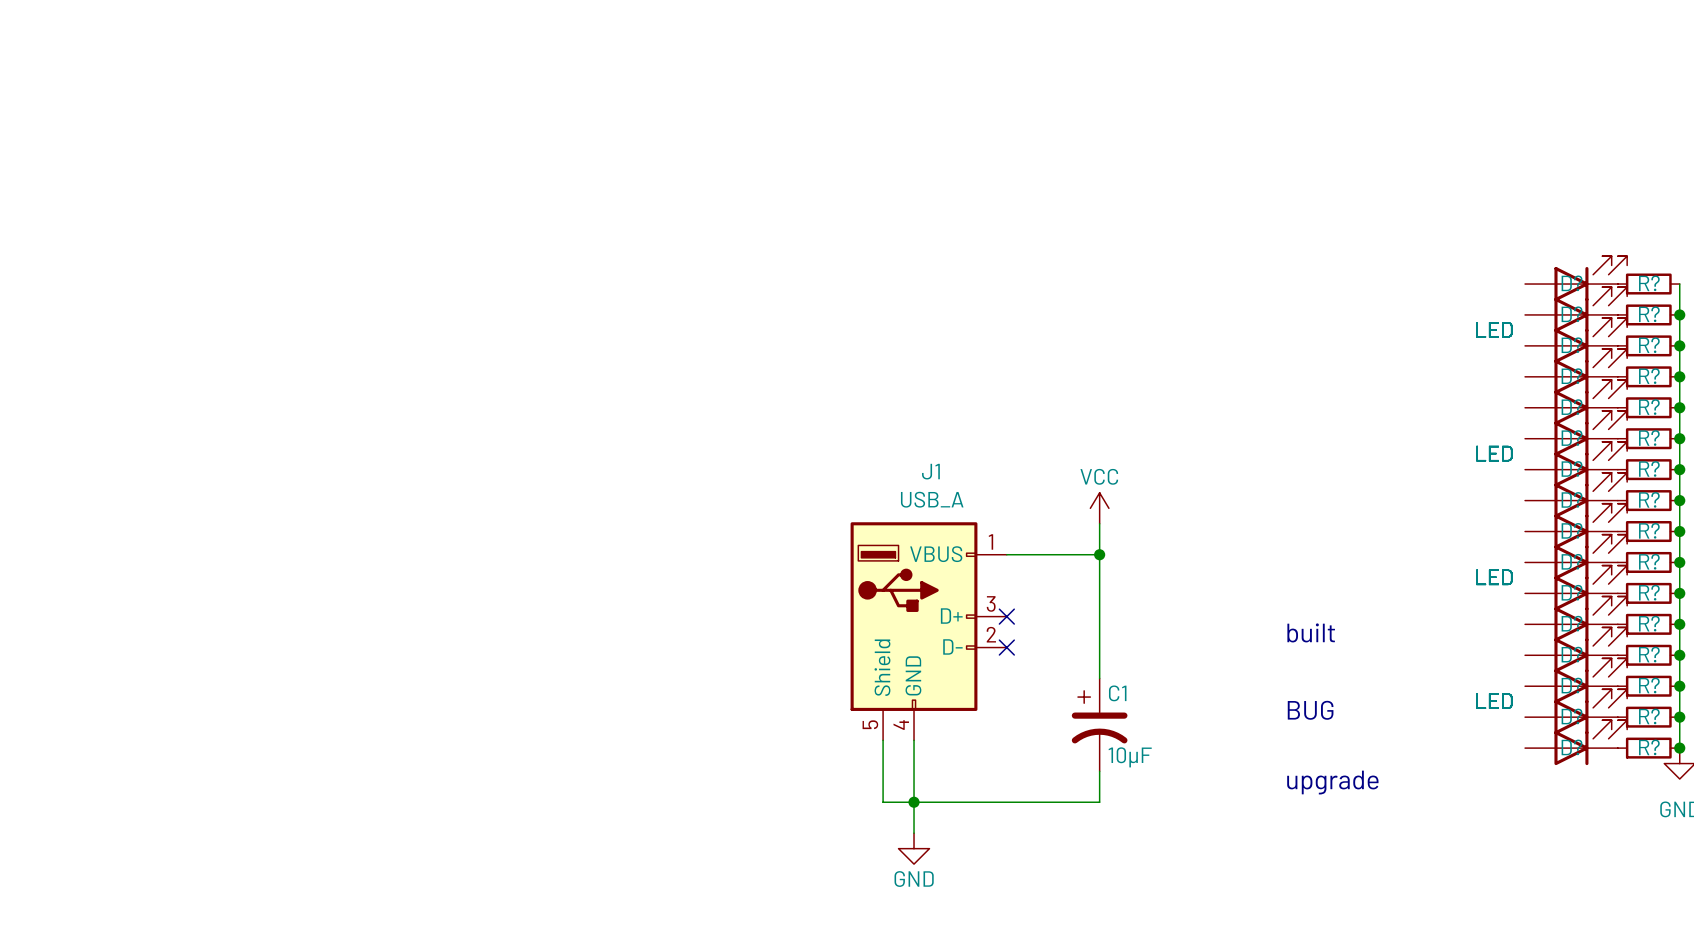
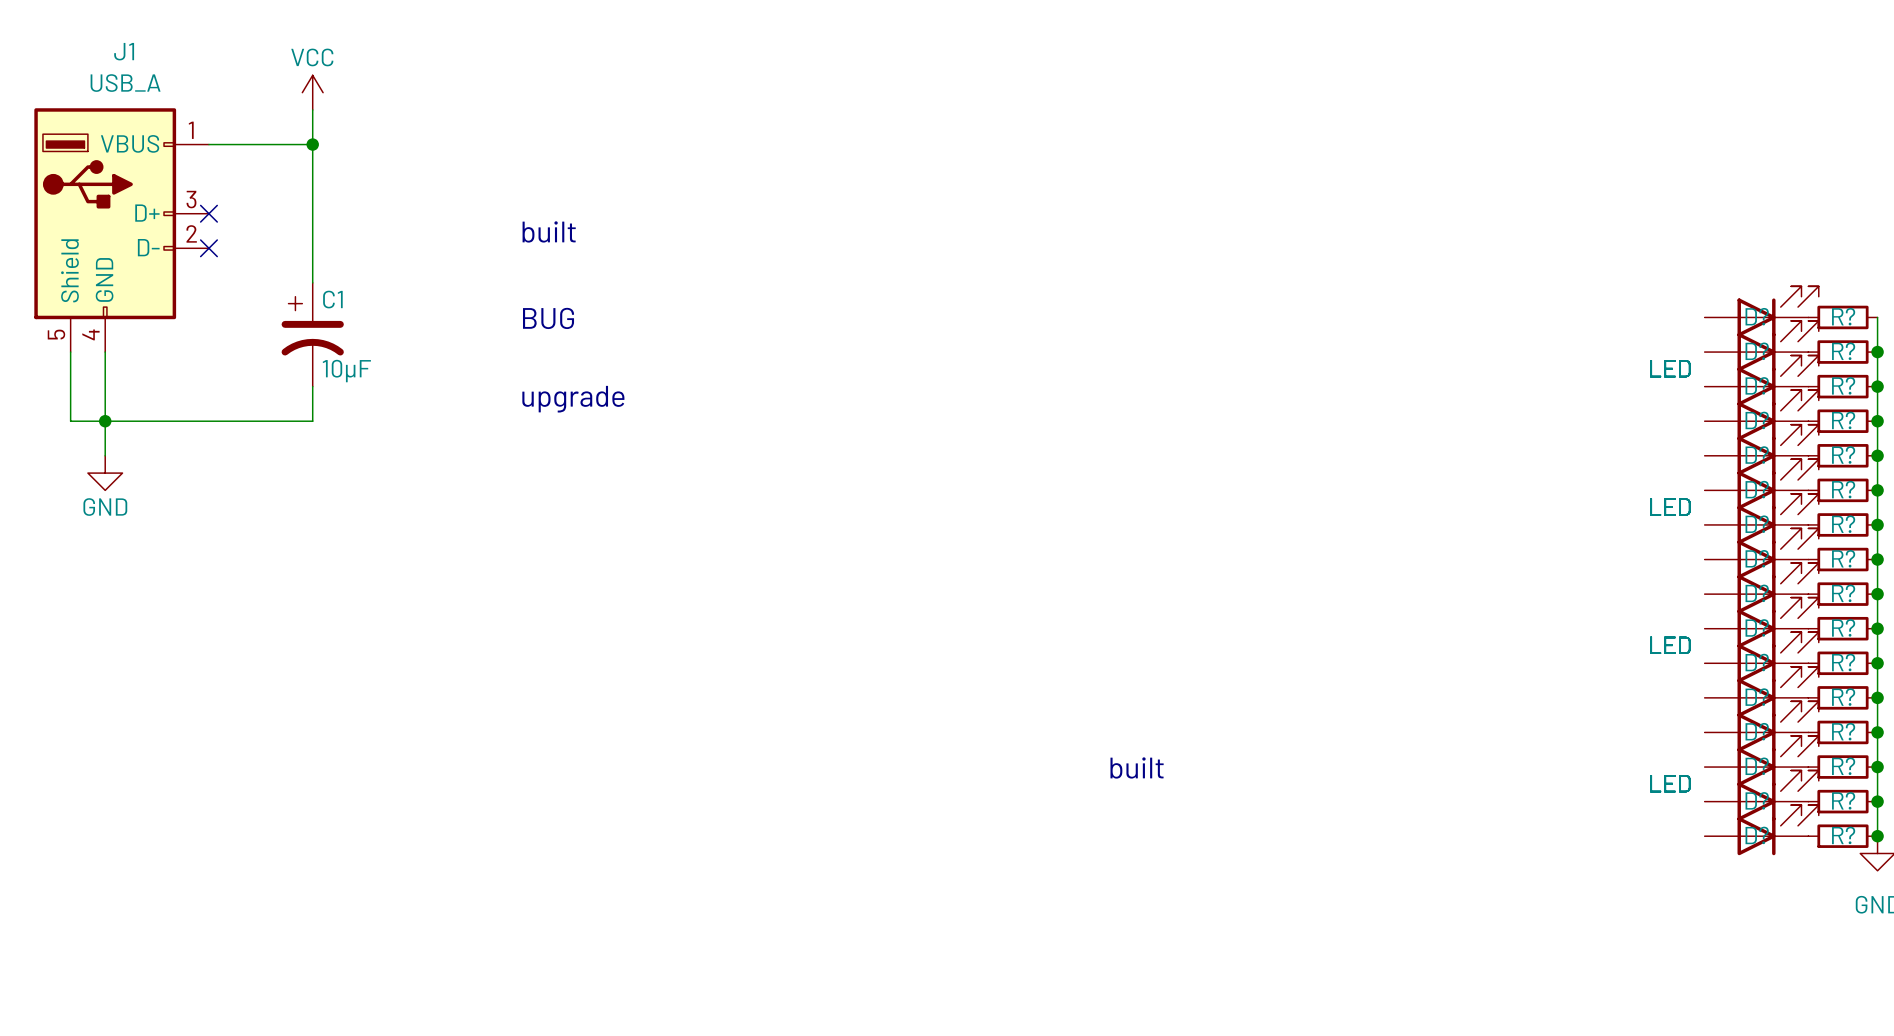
power symbol: none -> VCC (312, 92)
wire: none -> (312, 109) (312, 282)
wire: none -> (208, 144) (312, 144)
junction: none -> (312, 144)
no-connect mark: none -> (208, 213)
text: none -> built (549, 231)
no-connect mark: none -> (208, 248)
text: none -> BUG (548, 318)
wire: none -> (70, 352) (70, 421) (312, 421) (312, 386)
wire: none -> (105, 352) (105, 455)
text: none -> upgrade (573, 399)
junction: none -> (105, 421)
power symbol: none -> GND (105, 473)
power symbol: VCC (1099, 508) -> none
wire: (1099, 523) (1099, 678) -> none
wire: (1006, 554) (1099, 554) -> none
junction: (1099, 554) -> none
no-connect mark: (1006, 616) -> none
J1 position: (928, 631) -> (121, 230)
text position: built (1311, 632) -> built (1137, 767)
no-connect mark: (1006, 647) -> none
text: BUG (1310, 710) -> none
C1 position: (1099, 724) -> (312, 334)
wire: (883, 740) (883, 802) (1099, 802) (1099, 771) -> none
wire: (914, 740) (914, 833) -> none
text: upgrade (1332, 782) -> none
junction: (914, 802) -> none
power symbol: GND (914, 848) -> none

